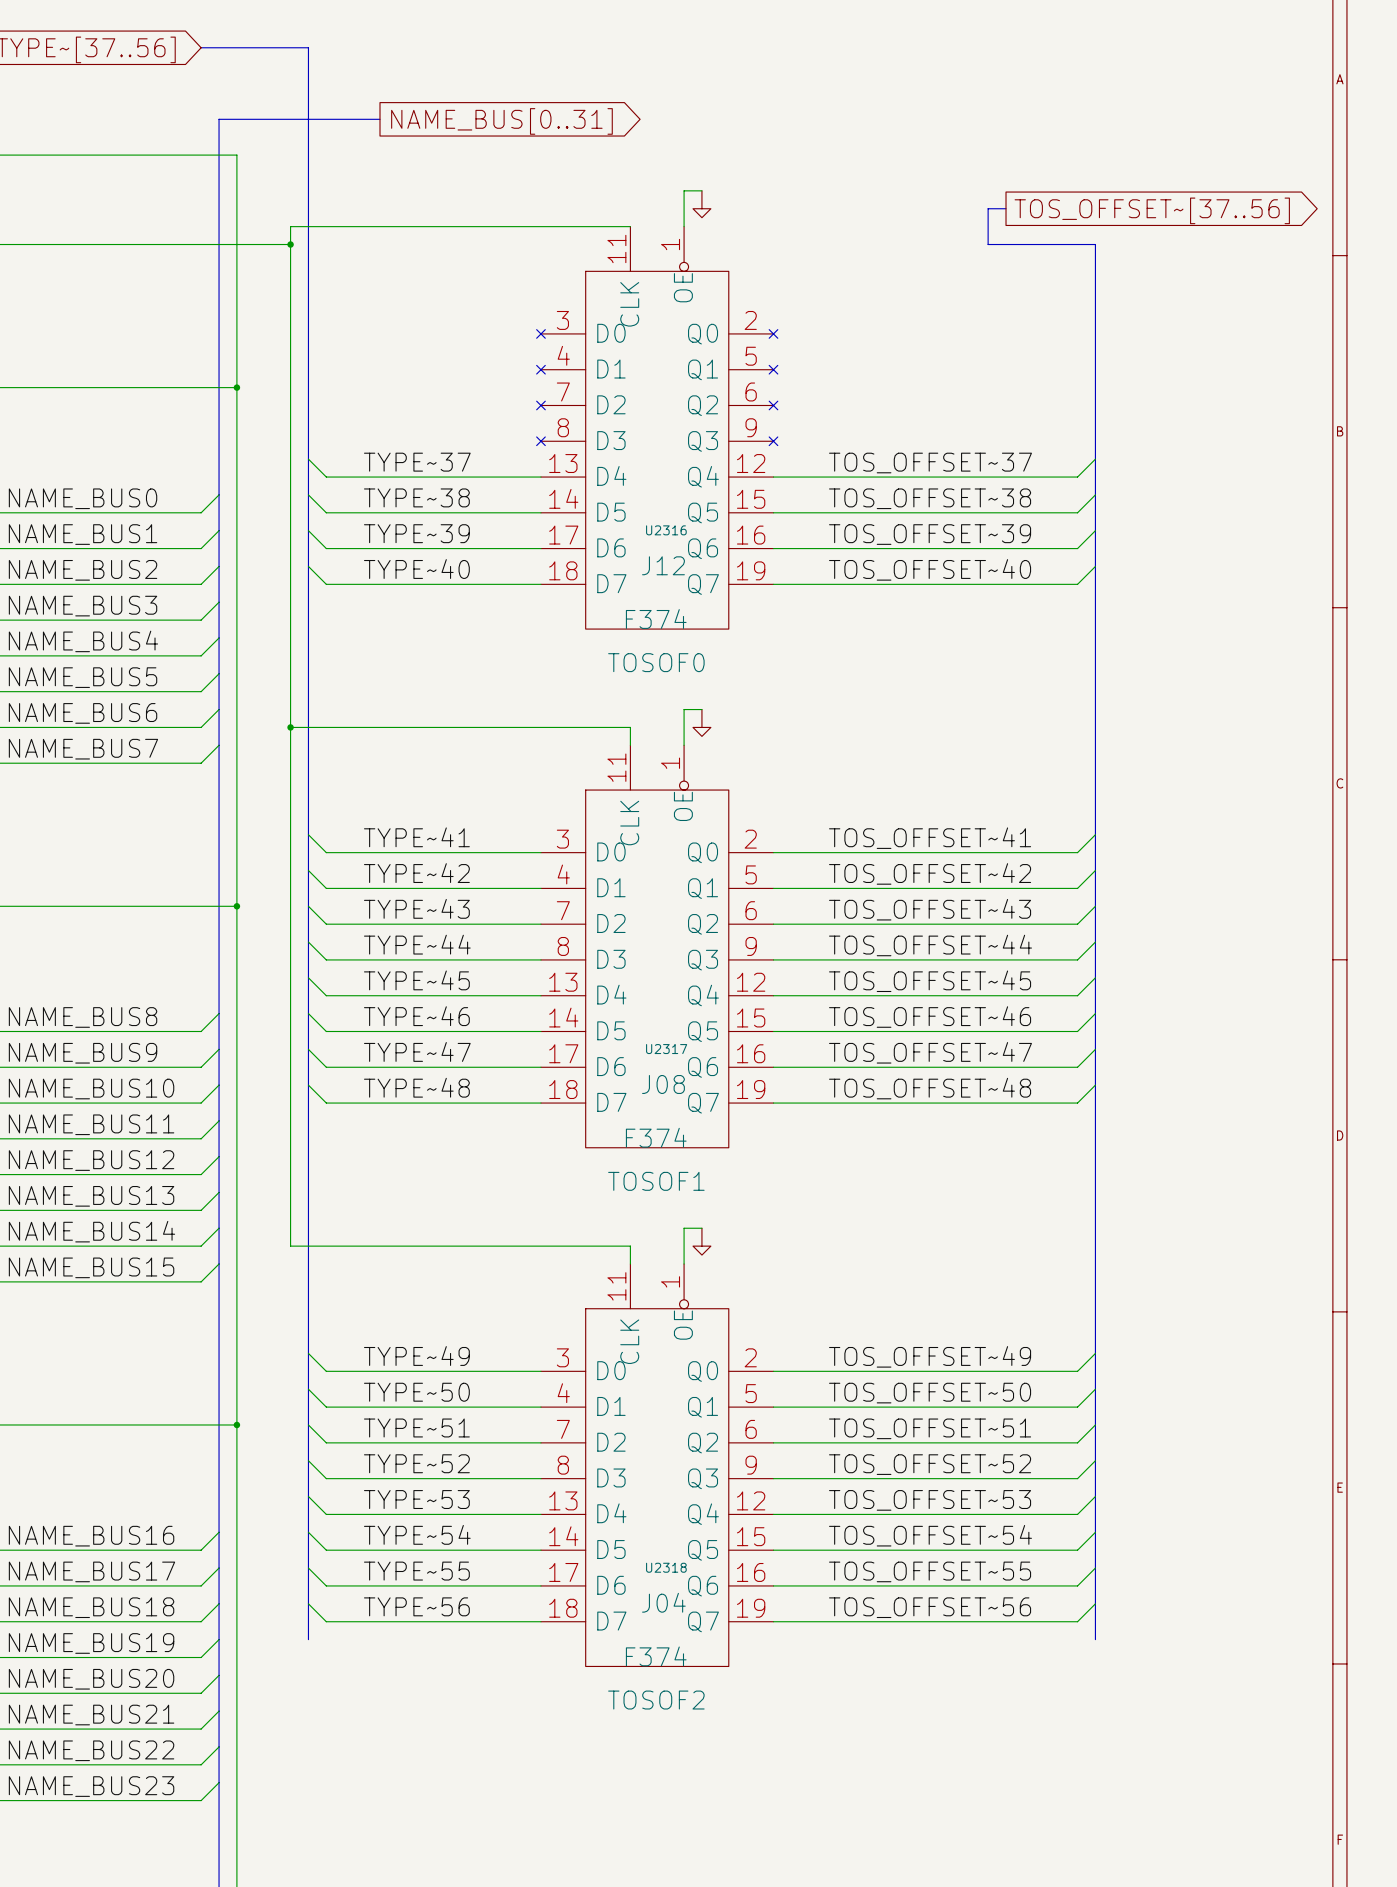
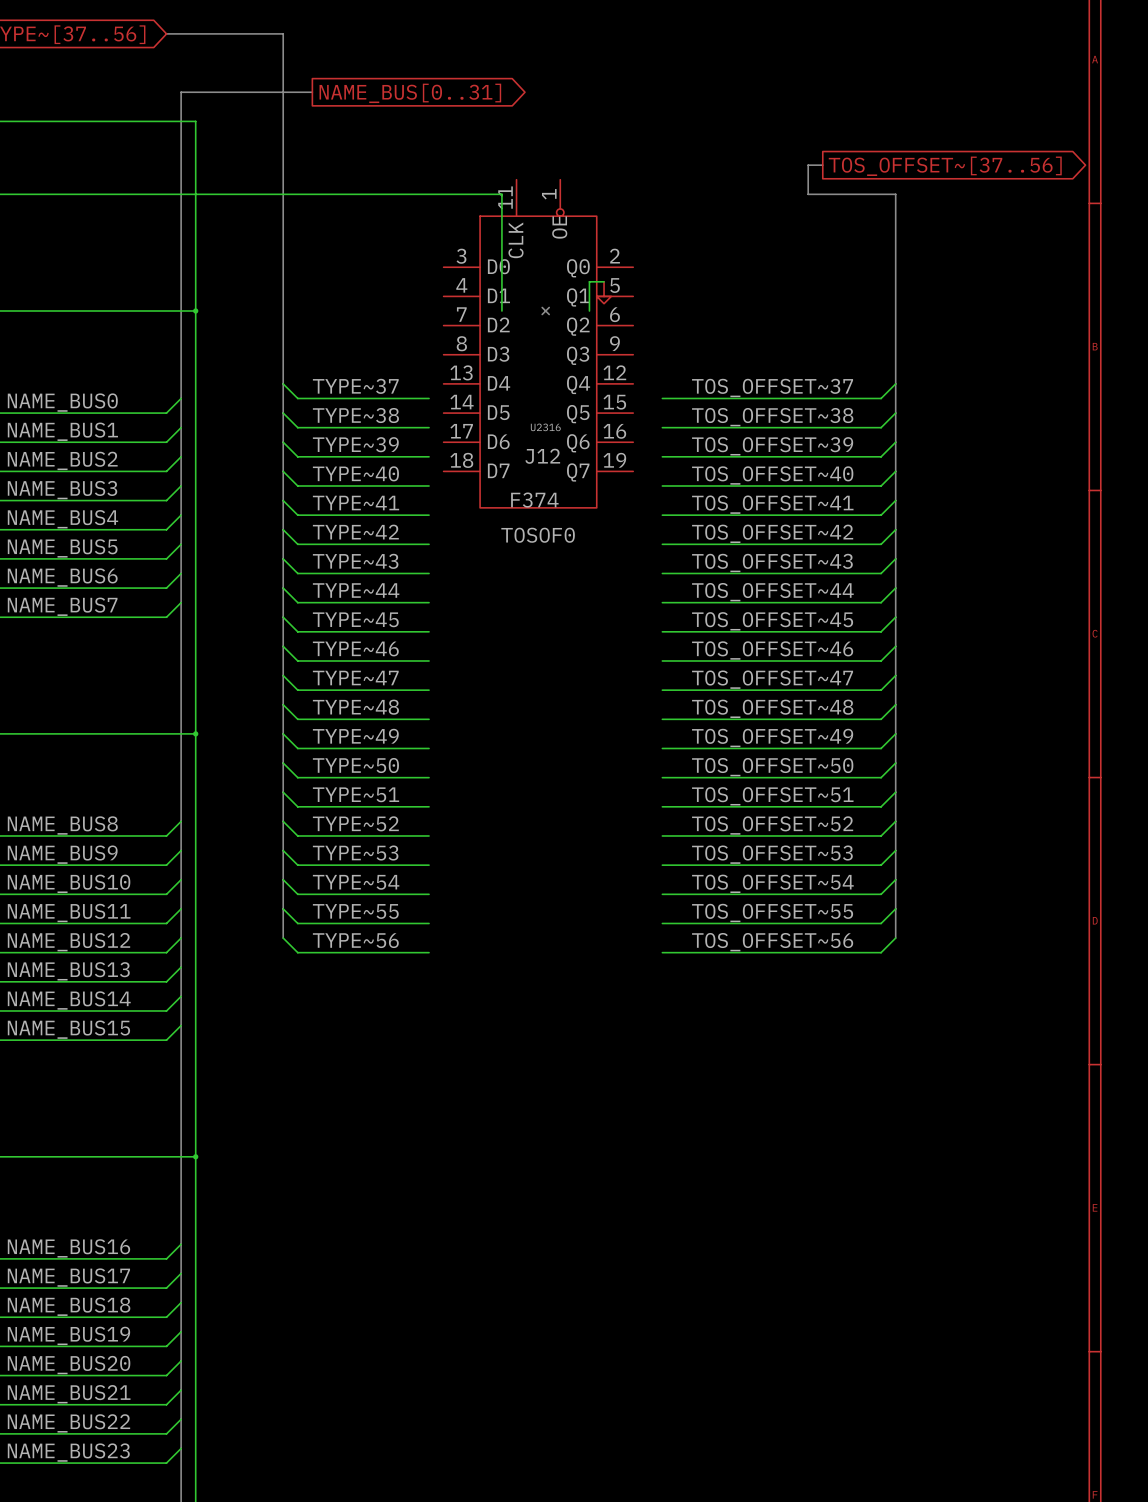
bus: (308, 47) (308, 1639) -> (254, 33) (283, 33) (283, 938)
wire: (701, 190) (684, 190) (684, 226) -> (604, 281) (589, 281) (589, 310)
power symbol position: (701, 204) -> (604, 292)
wire: (630, 226) (290, 226) (290, 1246) (630, 1246) (630, 1264) -> none
wire: none -> (239, 194) (501, 194) (501, 310)
junction: (290, 244) -> none
no-connect mark: (540, 333) -> none
no-connect mark: (773, 333) -> none
no-connect mark: (540, 369) -> none
no-connect mark: (773, 369) -> none
no-connect mark: none -> (545, 310)
no-connect mark: (540, 405) -> none
no-connect mark: (773, 405) -> none
no-connect mark: (540, 441) -> none
no-connect mark: (773, 441) -> none
wire: (308, 459) (326, 477) (540, 477) -> none
wire: (1095, 459) (1077, 477) (773, 477) -> none
label position: TYPE~37 (417, 462) -> TYPE~37 (355, 386)
label position: TOS_OFFSET~37 (930, 462) -> TOS_OFFSET~37 (772, 387)
wire: none -> (283, 383) (297, 398) (429, 398)
wire: none -> (895, 383) (881, 398) (662, 398)
wire: (308, 494) (326, 512) (540, 512) -> none
wire: (1095, 494) (1077, 512) (773, 512) -> none
label position: TYPE~38 (416, 497) -> TYPE~38 (355, 415)
label position: TOS_OFFSET~38 (930, 498) -> TOS_OFFSET~38 (772, 417)
wire: none -> (283, 413) (297, 427) (429, 427)
wire: none -> (895, 413) (881, 427) (662, 427)
wire: (308, 530) (326, 548) (540, 548) -> none
wire: (1095, 530) (1077, 548) (773, 548) -> none
label position: TYPE~39 (416, 533) -> TYPE~39 (355, 444)
label position: TOS_OFFSET~39 (930, 534) -> TOS_OFFSET~39 (772, 446)
wire: none -> (283, 442) (297, 456) (429, 456)
wire: none -> (895, 442) (881, 456) (662, 456)
wire: (308, 566) (326, 584) (540, 584) -> none
wire: (1095, 566) (1077, 584) (773, 584) -> none
label position: TYPE~40 (416, 569) -> TYPE~40 (355, 473)
label position: TOS_OFFSET~40 (930, 569) -> TOS_OFFSET~40 (772, 475)
wire: none -> (283, 471) (297, 485) (429, 485)
wire: none -> (895, 471) (881, 485) (662, 485)
wire: none -> (283, 500) (297, 515) (429, 515)
wire: none -> (895, 500) (881, 515) (662, 515)
label: none -> TYPE~41 (356, 503)
label: none -> TOS_OFFSET~41 (772, 504)
wire: none -> (283, 529) (297, 544) (429, 544)
wire: none -> (895, 529) (881, 544) (662, 544)
label: none -> TYPE~42 (355, 532)
label: none -> TOS_OFFSET~42 (772, 533)
wire: none -> (283, 558) (297, 573) (429, 573)
wire: none -> (895, 558) (881, 573) (662, 573)
label: none -> TYPE~43 (355, 561)
label: none -> TOS_OFFSET~43 (772, 562)
wire: (701, 709) (684, 709) (684, 745) -> none
power symbol: (701, 723) -> none
wire: (290, 727) (630, 727) (630, 745) -> none
junction: (290, 727) -> none
wire: none -> (283, 588) (297, 602) (429, 602)
wire: none -> (895, 588) (881, 602) (662, 602)
label: none -> TYPE~44 (356, 590)
label: none -> TOS_OFFSET~44 (772, 592)
wire: none -> (283, 617) (297, 631) (429, 631)
wire: none -> (895, 617) (881, 631) (662, 631)
label: none -> TYPE~45 (355, 619)
label: none -> TOS_OFFSET~45 (772, 621)
wire: none -> (283, 646) (297, 660) (429, 660)
wire: none -> (895, 646) (881, 660) (662, 660)
label: none -> TYPE~46 (355, 648)
label: none -> TOS_OFFSET~46 (772, 650)
wire: (308, 834) (326, 852) (362, 852) -> (283, 675) (297, 690)
label: TYPE~41 (416, 837) -> TYPE~47 (355, 678)
label: TOS_OFFSET~41 (930, 838) -> TOS_OFFSET~47 (772, 679)
wire: (523, 852) (540, 852) -> none
wire: (773, 852) (809, 852) -> none
wire: (308, 870) (326, 888) (362, 888) -> (283, 704) (297, 719)
label: TYPE~42 (416, 873) -> TYPE~48 (355, 707)
label: TOS_OFFSET~42 (930, 873) -> TOS_OFFSET~48 (772, 708)
wire: (523, 888) (540, 888) -> none
wire: (773, 888) (809, 888) -> none
wire: (308, 906) (326, 924) (362, 924) -> (283, 733) (297, 748)
label: TYPE~43 (416, 908) -> TYPE~49 (355, 736)
label: TOS_OFFSET~43 (930, 909) -> TOS_OFFSET~49 (772, 737)
wire: (523, 924) (540, 924) -> none
wire: (773, 924) (809, 924) -> none
wire: (308, 942) (326, 959) (362, 959) -> (283, 763) (297, 777)
label: TYPE~44 (417, 944) -> TYPE~50 (355, 765)
label: TOS_OFFSET~44 (930, 945) -> TOS_OFFSET~50 (772, 767)
U2317: F374 (657, 946) -> none
wire: (523, 959) (540, 959) -> none
wire: (773, 959) (809, 959) -> none
wire: (308, 977) (326, 995) (362, 995) -> (283, 792) (297, 806)
label: TYPE~45 (416, 980) -> TYPE~51 (356, 794)
label: TOS_OFFSET~45 (930, 981) -> TOS_OFFSET~51 (772, 796)
wire: (523, 995) (540, 995) -> none
wire: (773, 995) (809, 995) -> none
wire: (308, 1013) (326, 1031) (362, 1031) -> (283, 821) (297, 835)
label: TYPE~46 (416, 1016) -> TYPE~52 (355, 823)
label: TOS_OFFSET~46 (930, 1017) -> TOS_OFFSET~52 (772, 825)
wire: (523, 1031) (540, 1031) -> none
wire: (773, 1031) (809, 1031) -> none
wire: (308, 1049) (326, 1067) (362, 1067) -> (283, 850) (297, 865)
label: TYPE~47 (417, 1051) -> TYPE~53 (355, 853)
label: TOS_OFFSET~47 (930, 1052) -> TOS_OFFSET~53 (772, 854)
wire: (523, 1067) (540, 1067) -> none
wire: (773, 1067) (809, 1067) -> none
wire: (308, 1085) (326, 1103) (362, 1103) -> (283, 879) (297, 894)
label: TYPE~48 (416, 1087) -> TYPE~54 (356, 882)
label: TOS_OFFSET~48 (930, 1088) -> TOS_OFFSET~54 (772, 883)
wire: (523, 1103) (540, 1103) -> none
wire: (773, 1103) (809, 1103) -> none
wire: none -> (283, 908) (297, 923) (429, 923)
wire: none -> (895, 908) (881, 923) (662, 923)
label: none -> TYPE~55 (355, 911)
label: none -> TOS_OFFSET~55 (772, 912)
wire: none -> (283, 938) (297, 952) (429, 952)
bus: (1095, 1156) (1095, 1639) -> none
wire: none -> (895, 938) (881, 952) (662, 952)
label: none -> TYPE~56 (355, 940)
label: none -> TOS_OFFSET~56 (772, 942)
wire: (701, 1228) (684, 1228) (684, 1264) -> none
power symbol: (701, 1241) -> none
wire: (308, 1353) (326, 1371) (540, 1371) -> none
wire: (1095, 1353) (1077, 1371) (773, 1371) -> none
label: TYPE~49 (416, 1356) -> none
label: TOS_OFFSET~49 (930, 1356) -> none
wire: (308, 1389) (326, 1407) (540, 1407) -> none
wire: (1095, 1389) (1077, 1407) (773, 1407) -> none
label: TYPE~50 (416, 1392) -> none
label: TOS_OFFSET~50 (930, 1393) -> none
wire: (308, 1424) (326, 1442) (540, 1442) -> none
wire: (1095, 1424) (1077, 1442) (773, 1442) -> none
label: TYPE~51 (416, 1427) -> none
label: TOS_OFFSET~51 (930, 1428) -> none
wire: (308, 1460) (326, 1478) (540, 1478) -> none
wire: (1095, 1460) (1077, 1478) (773, 1478) -> none
label: TYPE~52 (416, 1463) -> none
label: TOS_OFFSET~52 (930, 1464) -> none
U2318: F374 (657, 1465) -> none
wire: (308, 1496) (326, 1514) (540, 1514) -> none
wire: (1095, 1496) (1077, 1514) (773, 1514) -> none
label: TYPE~53 (416, 1499) -> none
label: TOS_OFFSET~53 (930, 1500) -> none
wire: (308, 1532) (326, 1550) (540, 1550) -> none
wire: (1095, 1532) (1077, 1550) (773, 1550) -> none
label: TYPE~54 (417, 1534) -> none
label: TOS_OFFSET~54 (930, 1535) -> none
wire: (308, 1568) (326, 1585) (540, 1585) -> none
wire: (1095, 1568) (1077, 1585) (773, 1585) -> none
label: TYPE~55 (416, 1571) -> none
label: TOS_OFFSET~55 (930, 1571) -> none
wire: (308, 1603) (326, 1621) (540, 1621) -> none
wire: (1095, 1603) (1077, 1621) (773, 1621) -> none
label: TYPE~56 (416, 1606) -> none
label: TOS_OFFSET~56 (930, 1607) -> none

